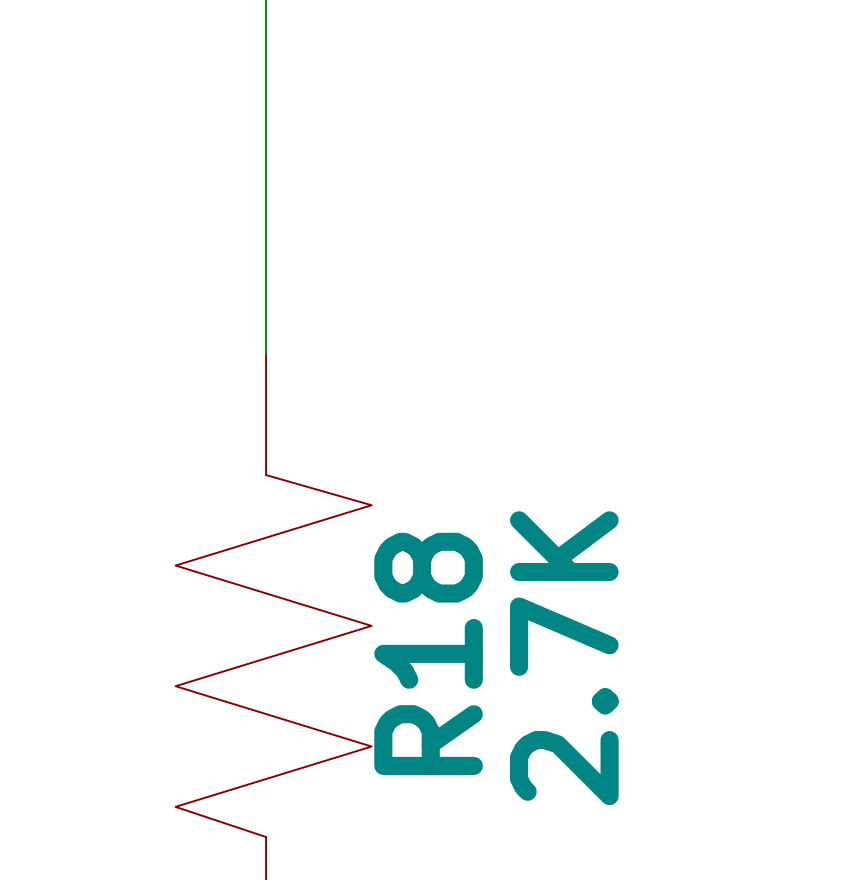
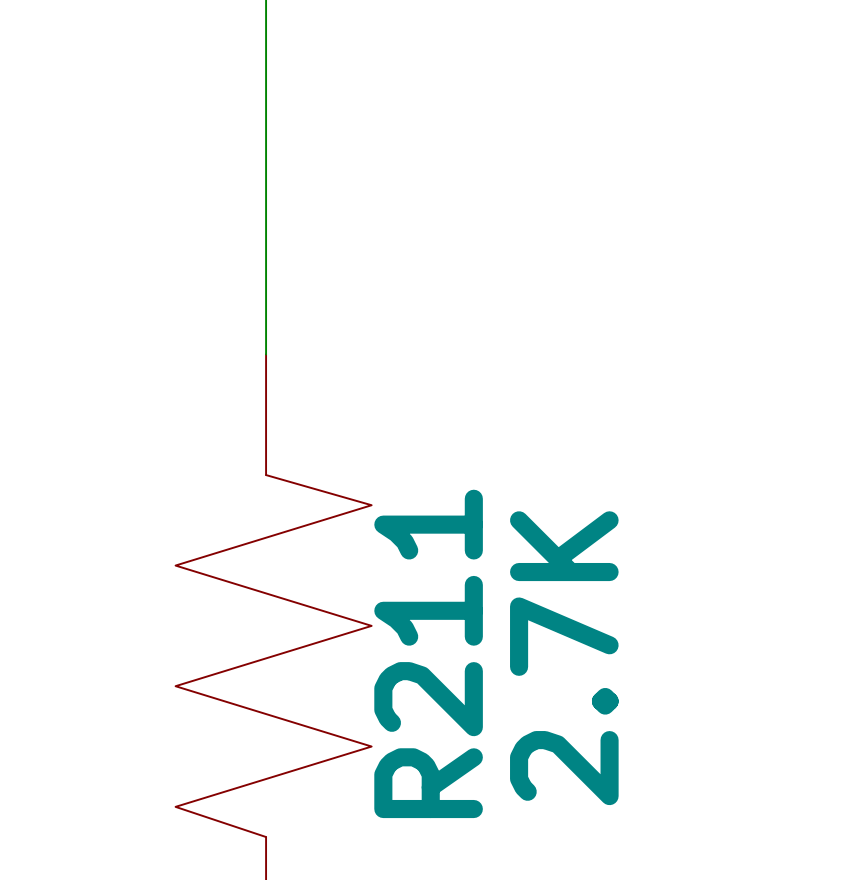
R18 name: R18 (428, 653) -> R211 (428, 653)

